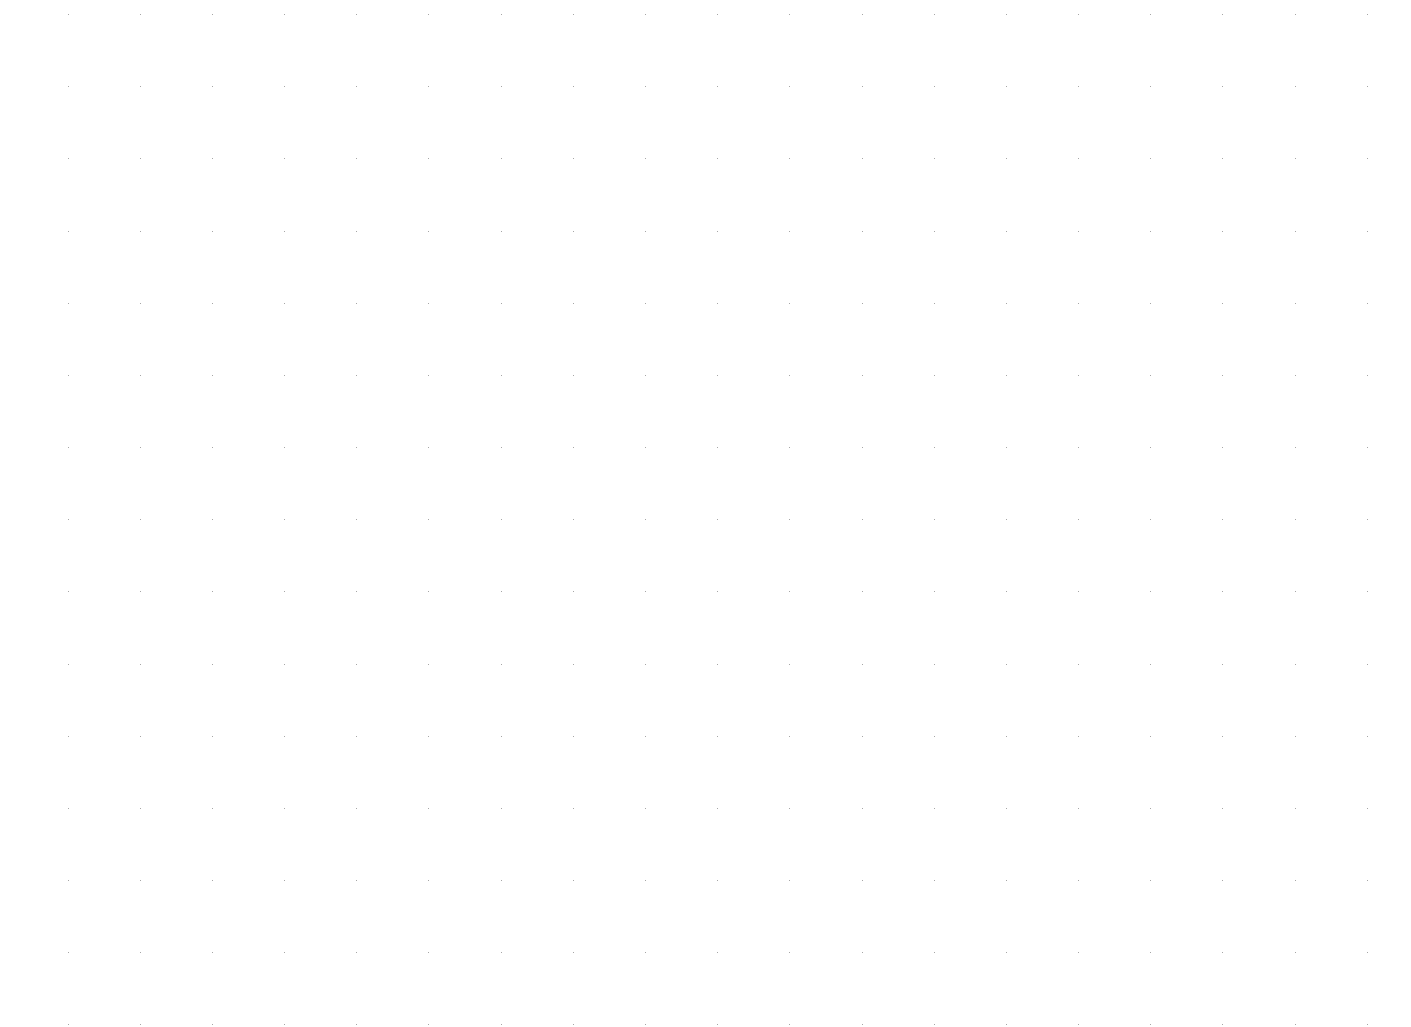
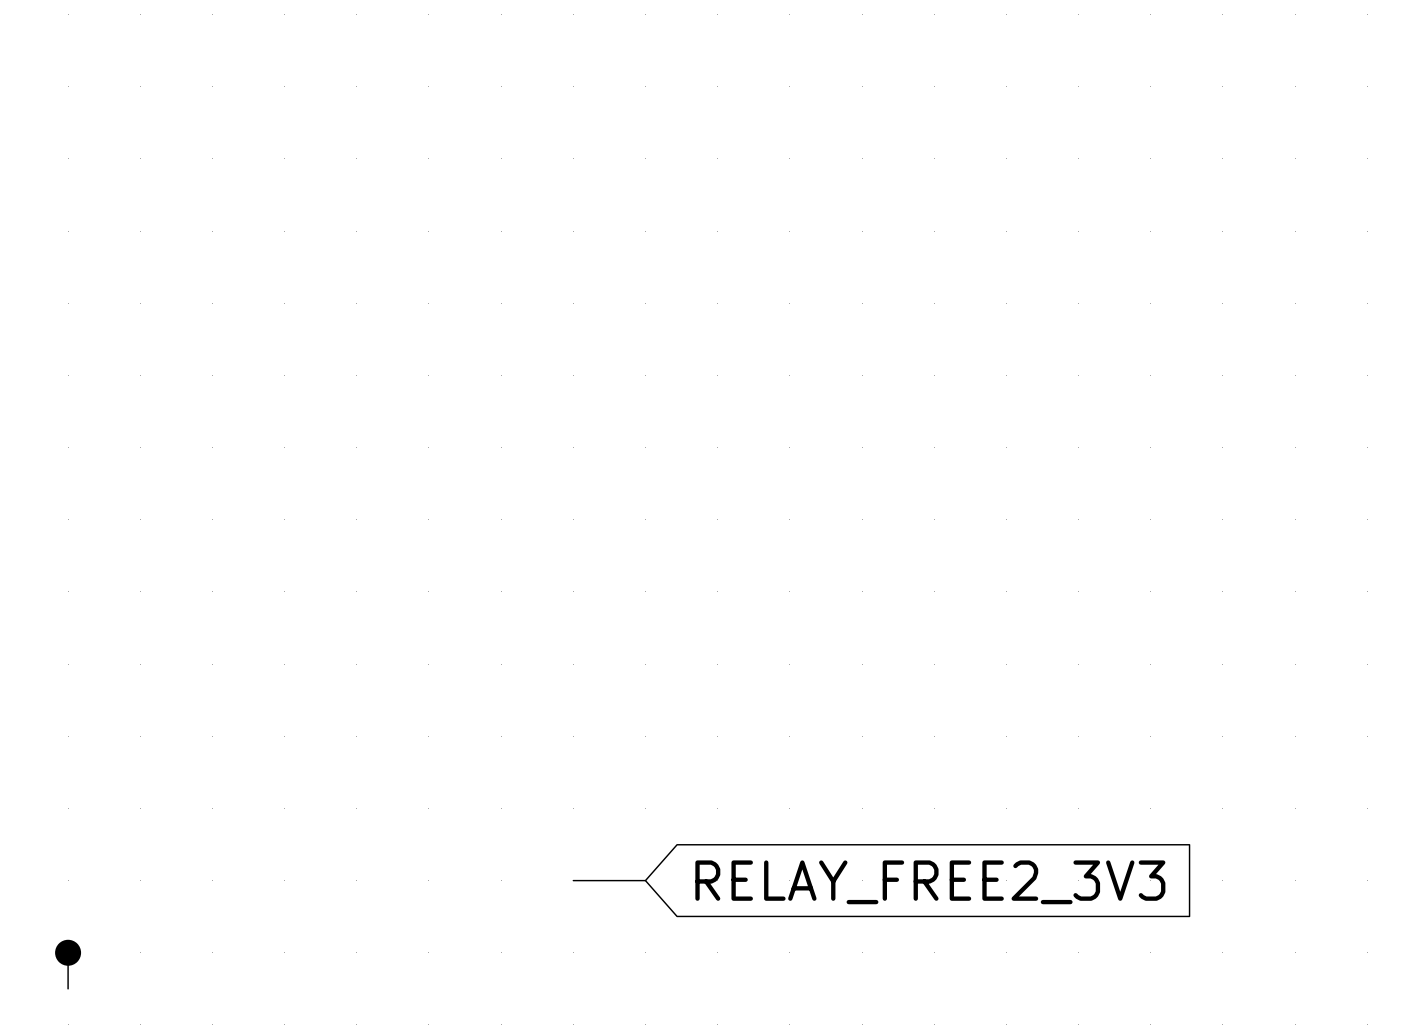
wire: none -> (573, 880) (645, 880)
global label: none -> RELAY_FREE2_3V3 (930, 882)
wire: none -> (68, 952) (68, 988)
junction: none -> (68, 952)

